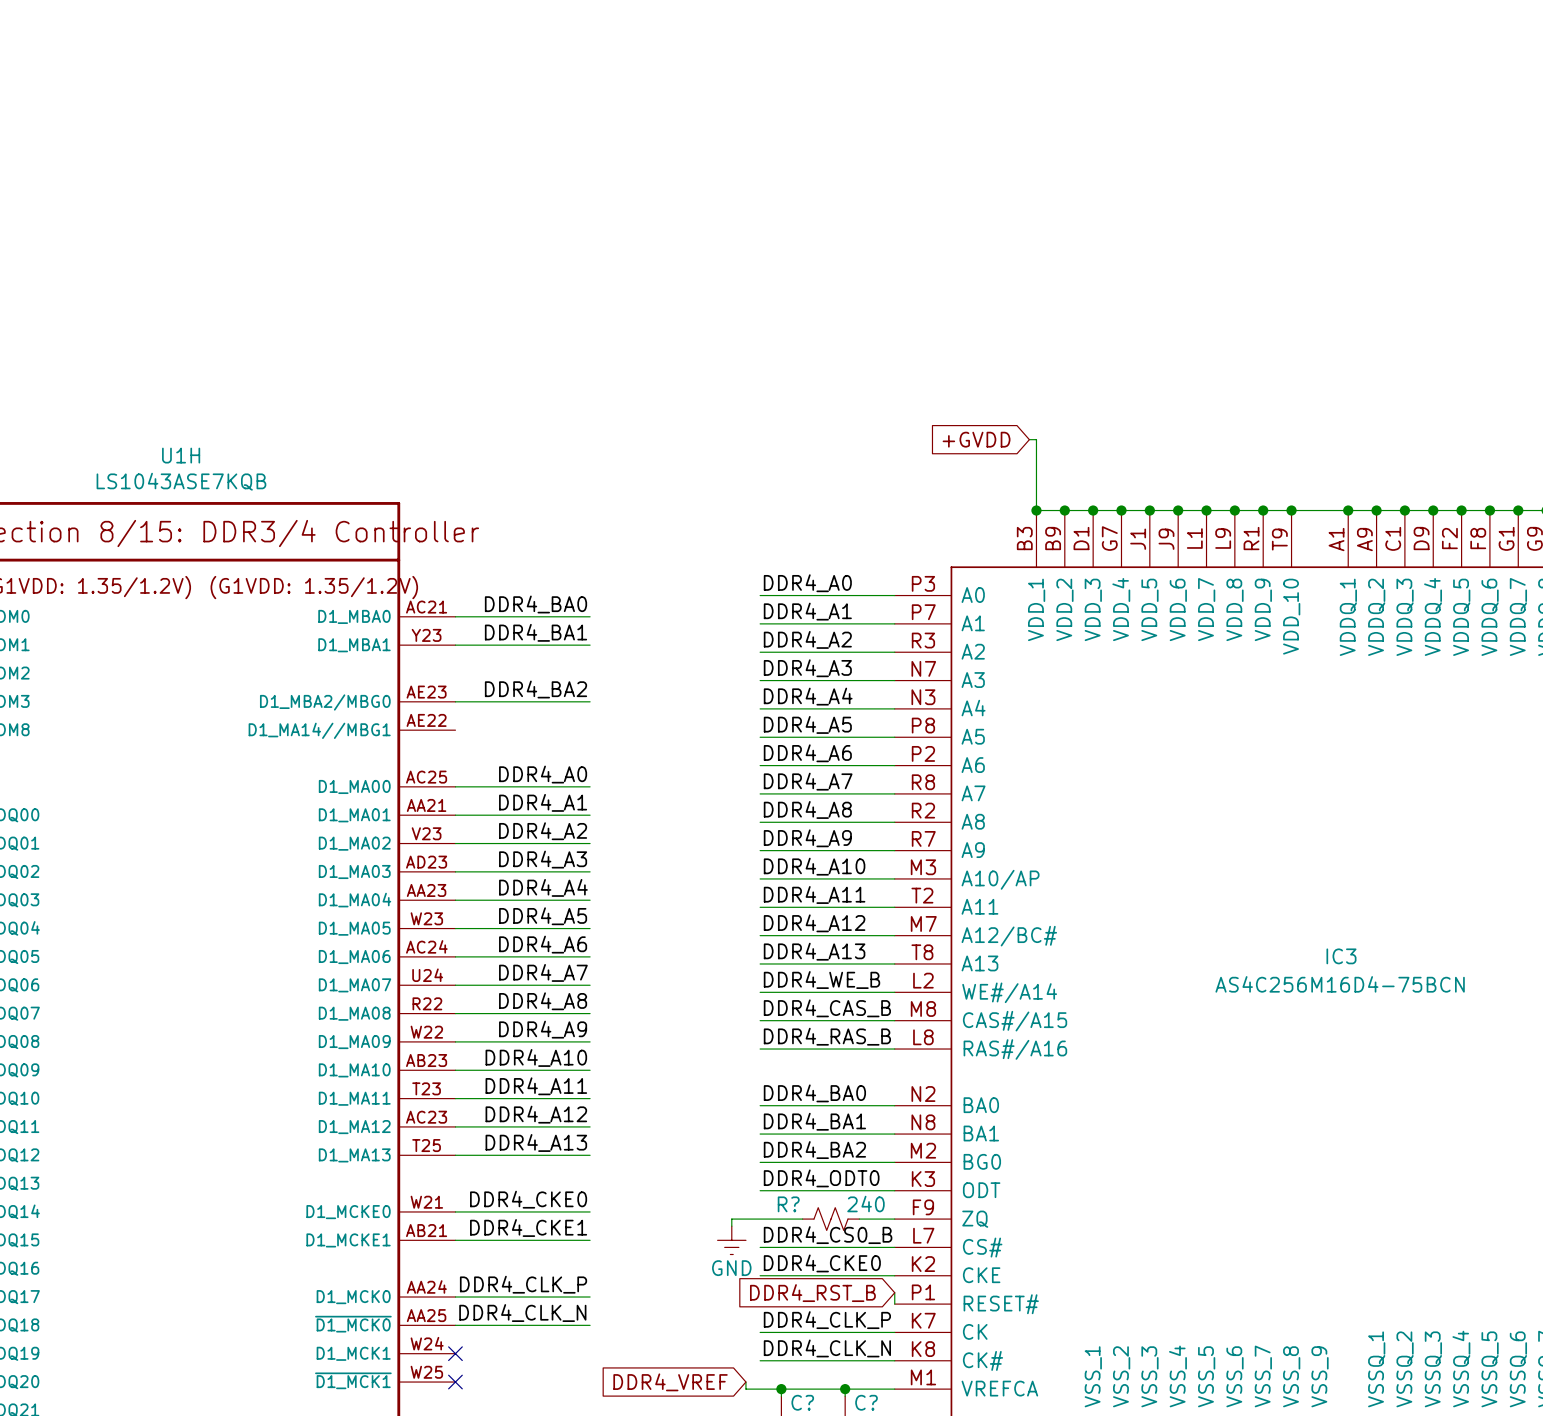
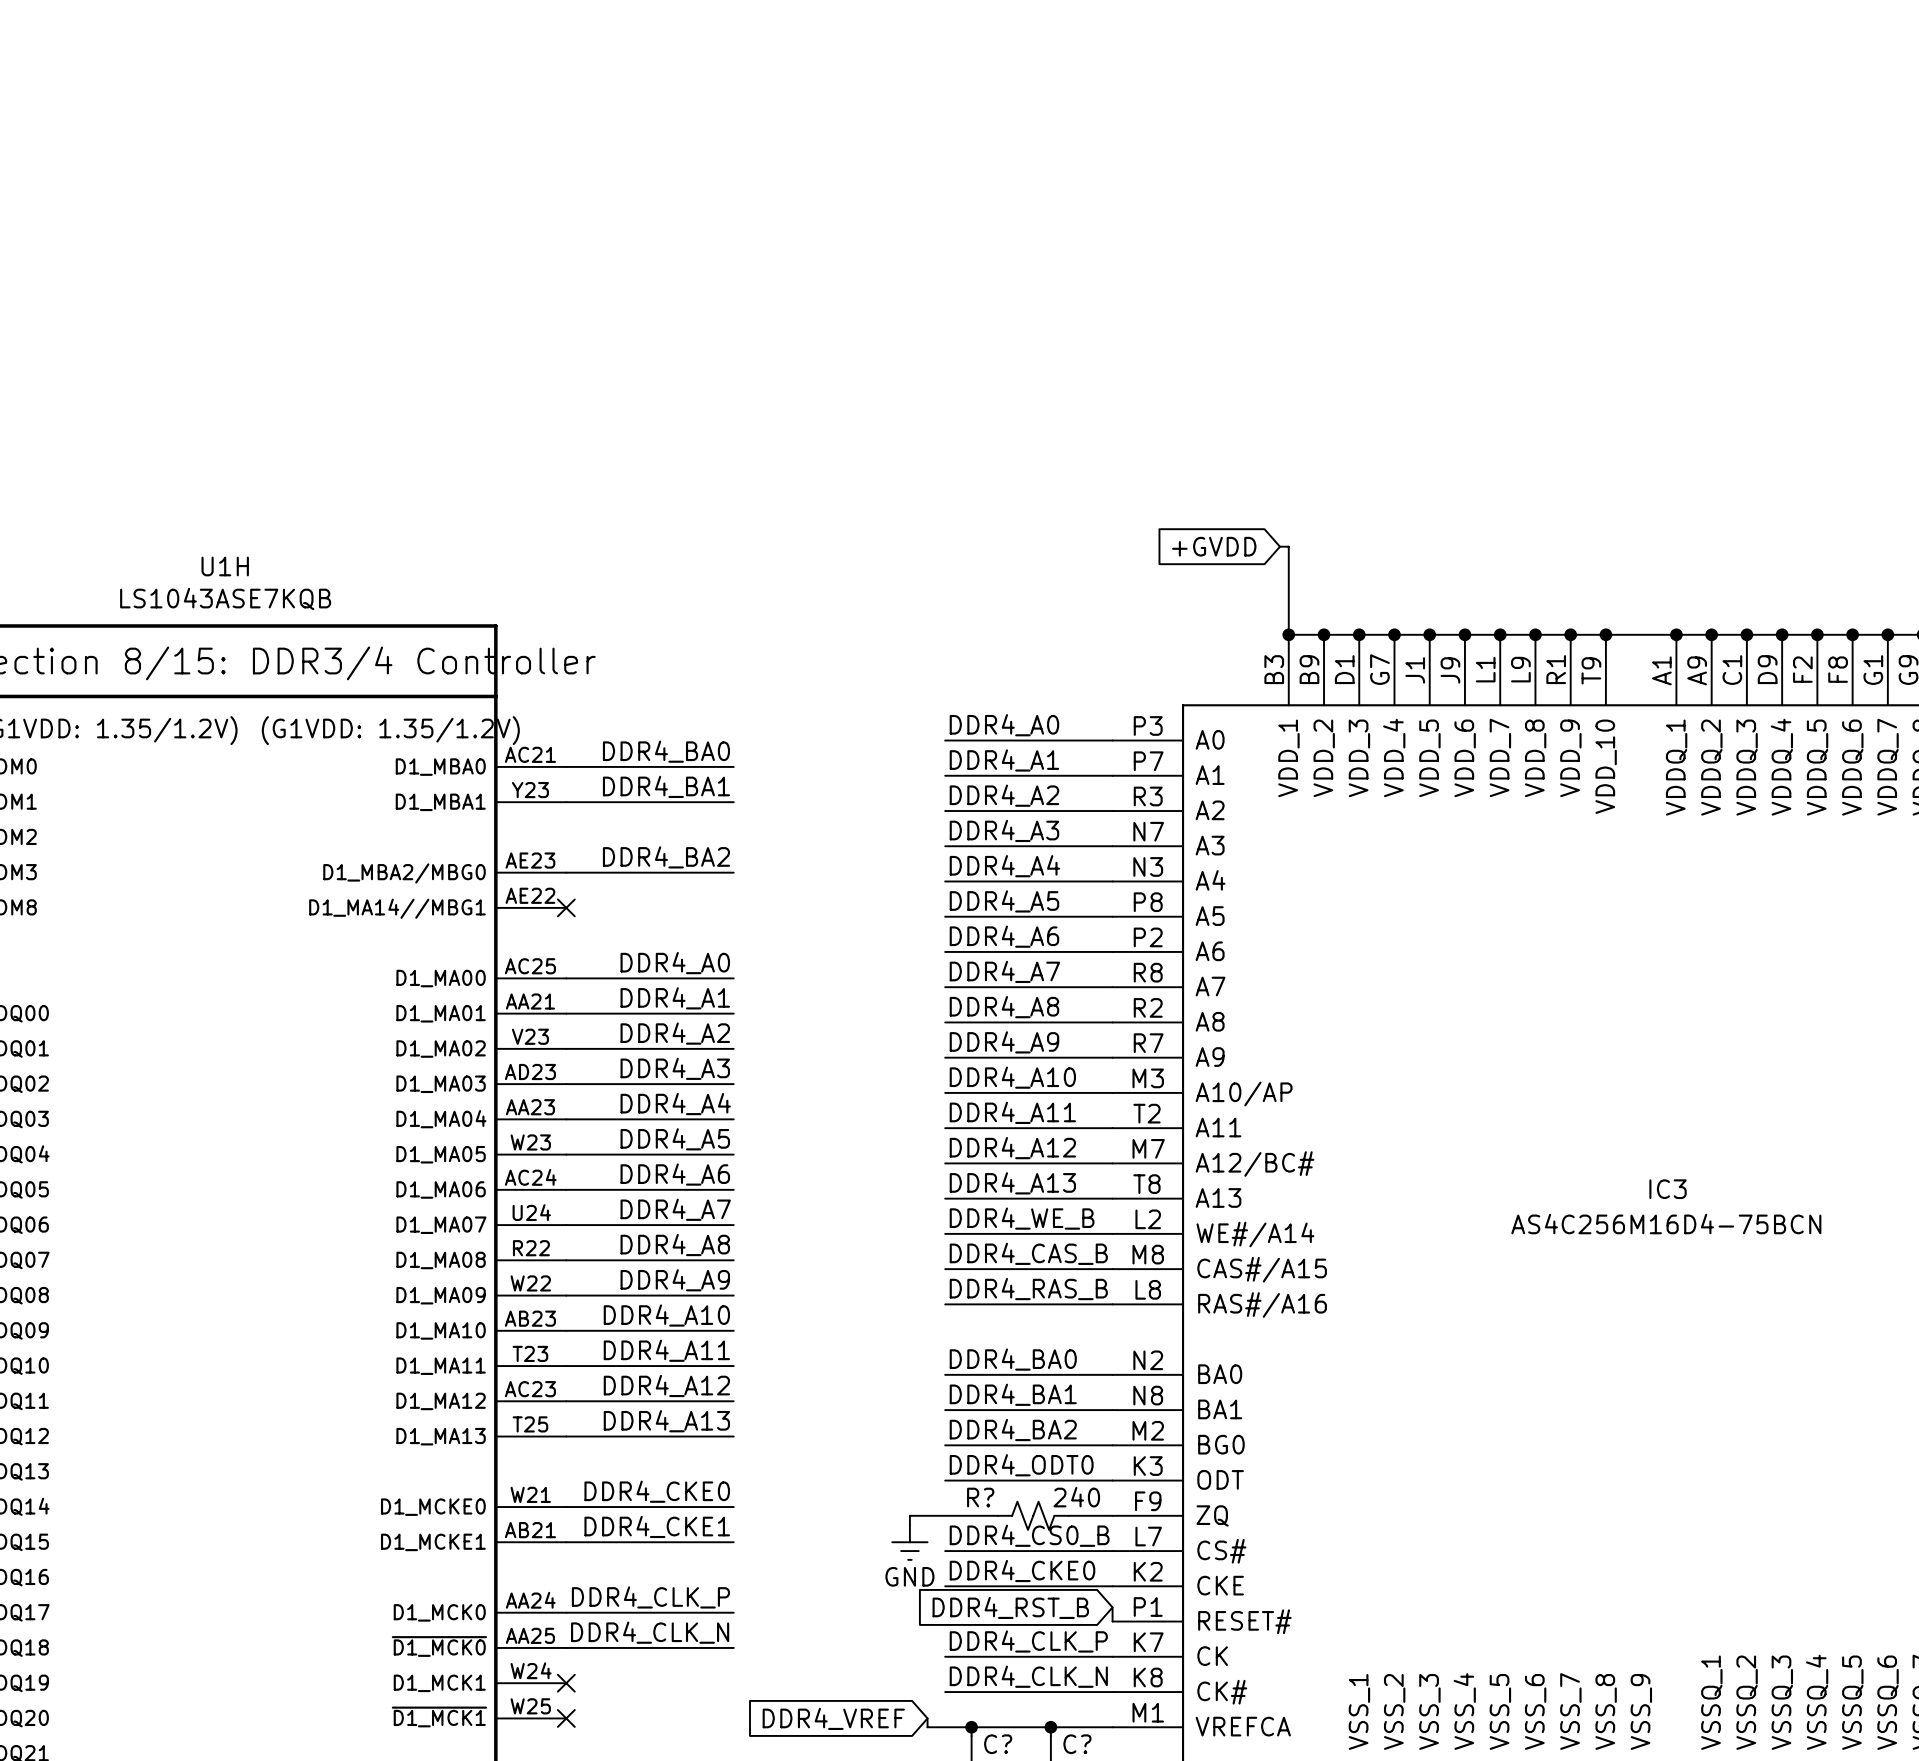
no-connect mark: none -> (566, 907)

